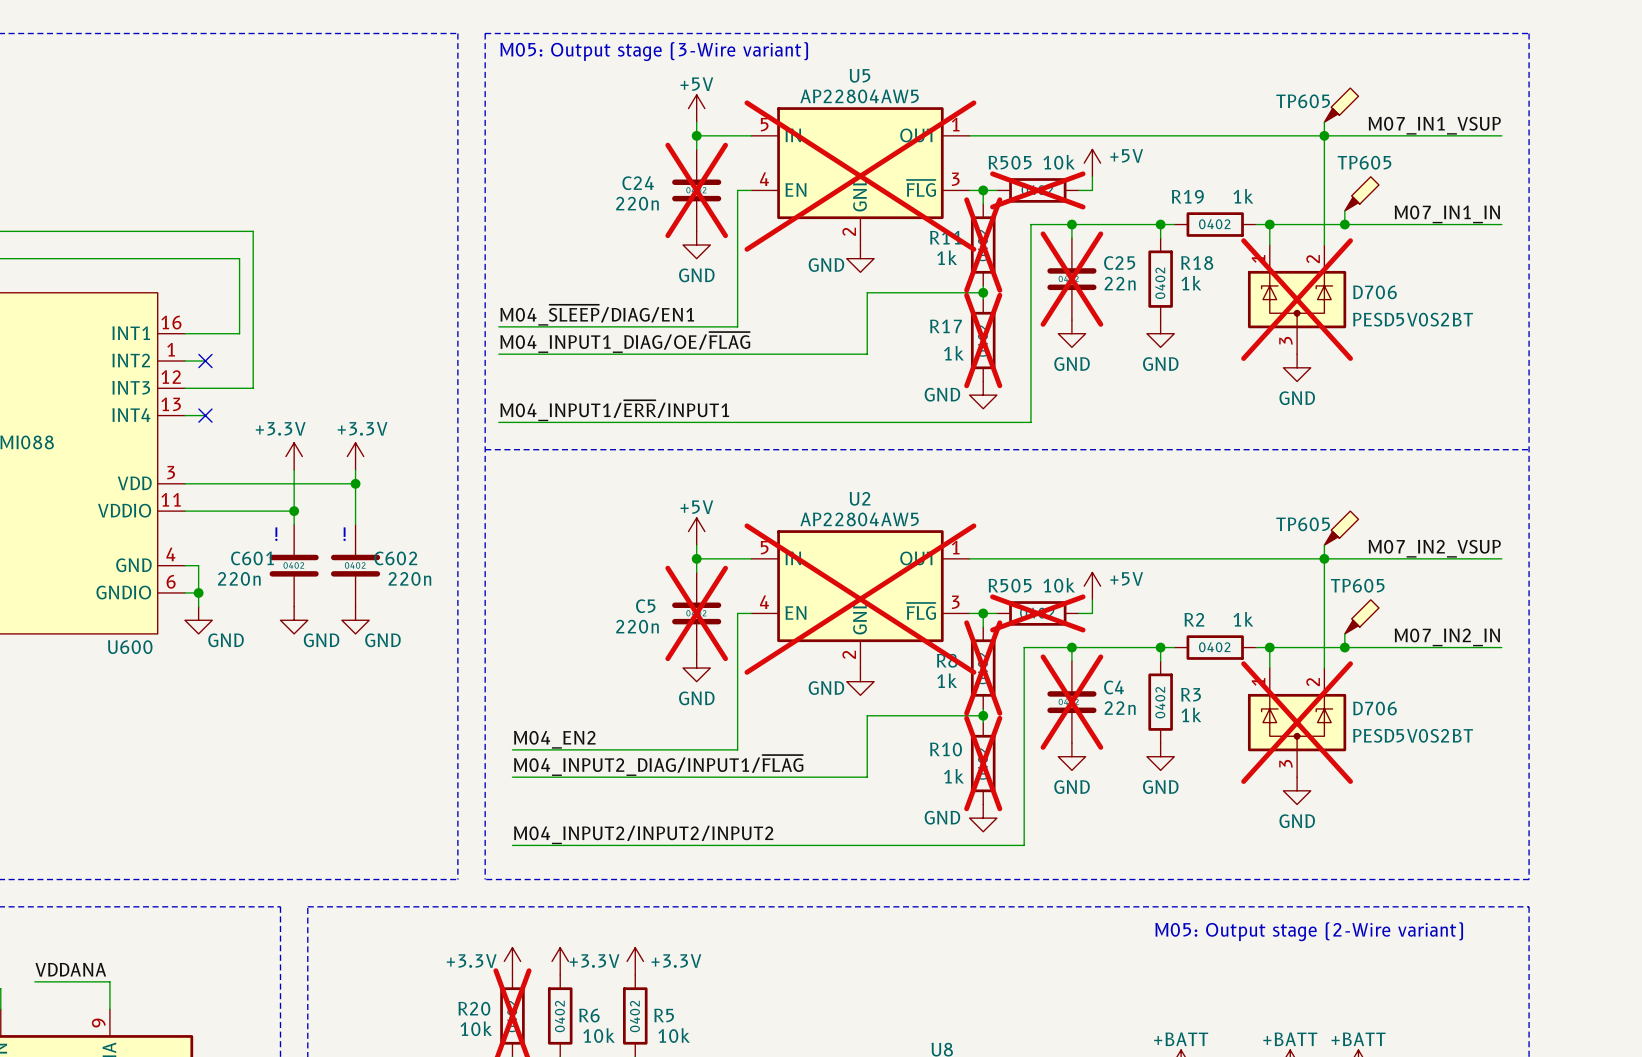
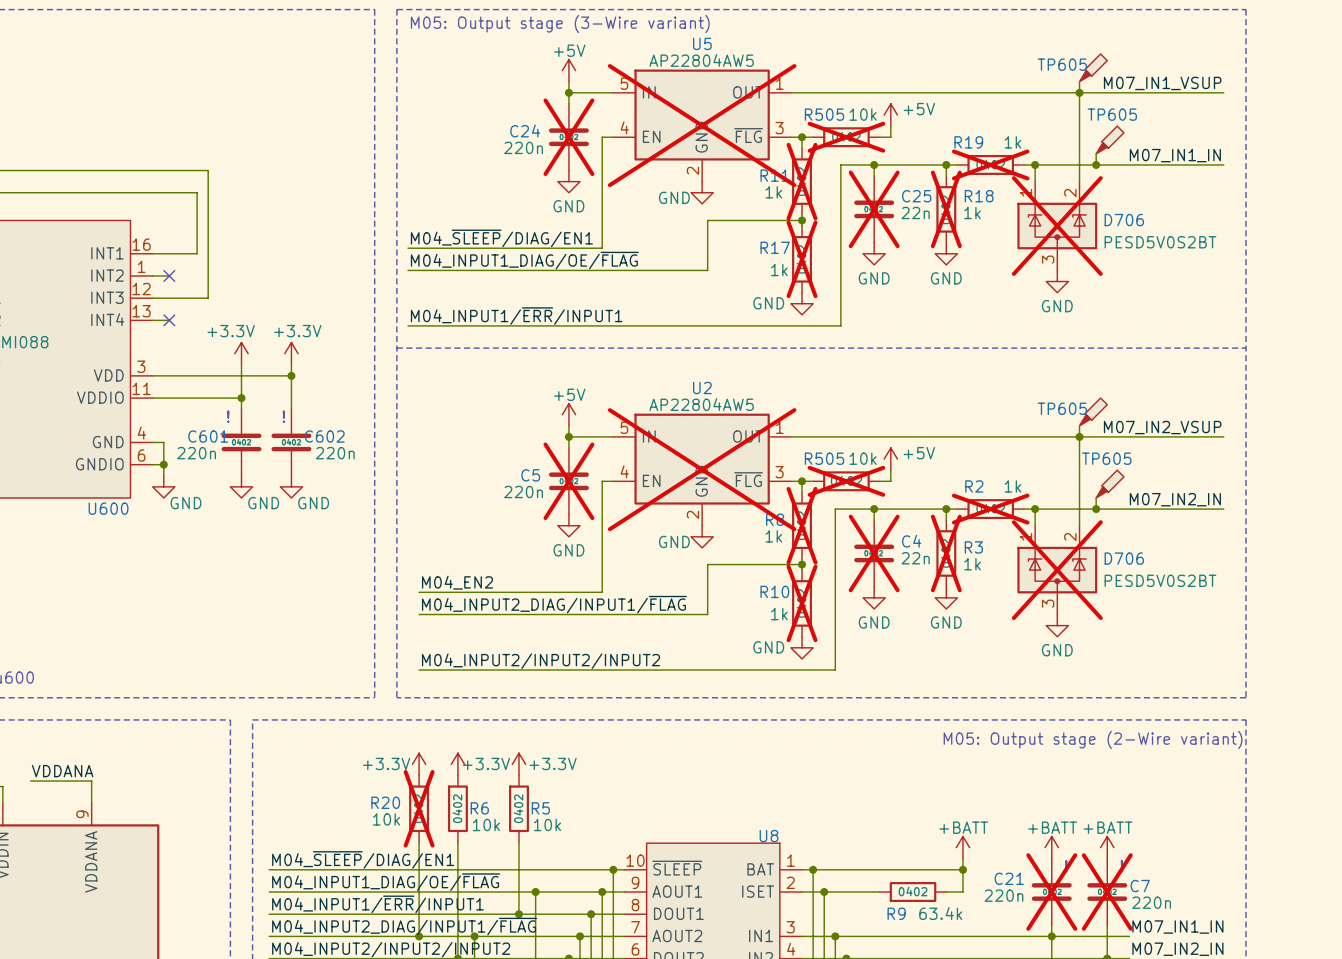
R19 do-not-place cross: none -> (990, 164)
R18 do-not-place cross: none -> (946, 209)
R2 do-not-place cross: none -> (990, 509)
R3 do-not-place cross: none -> (946, 553)

